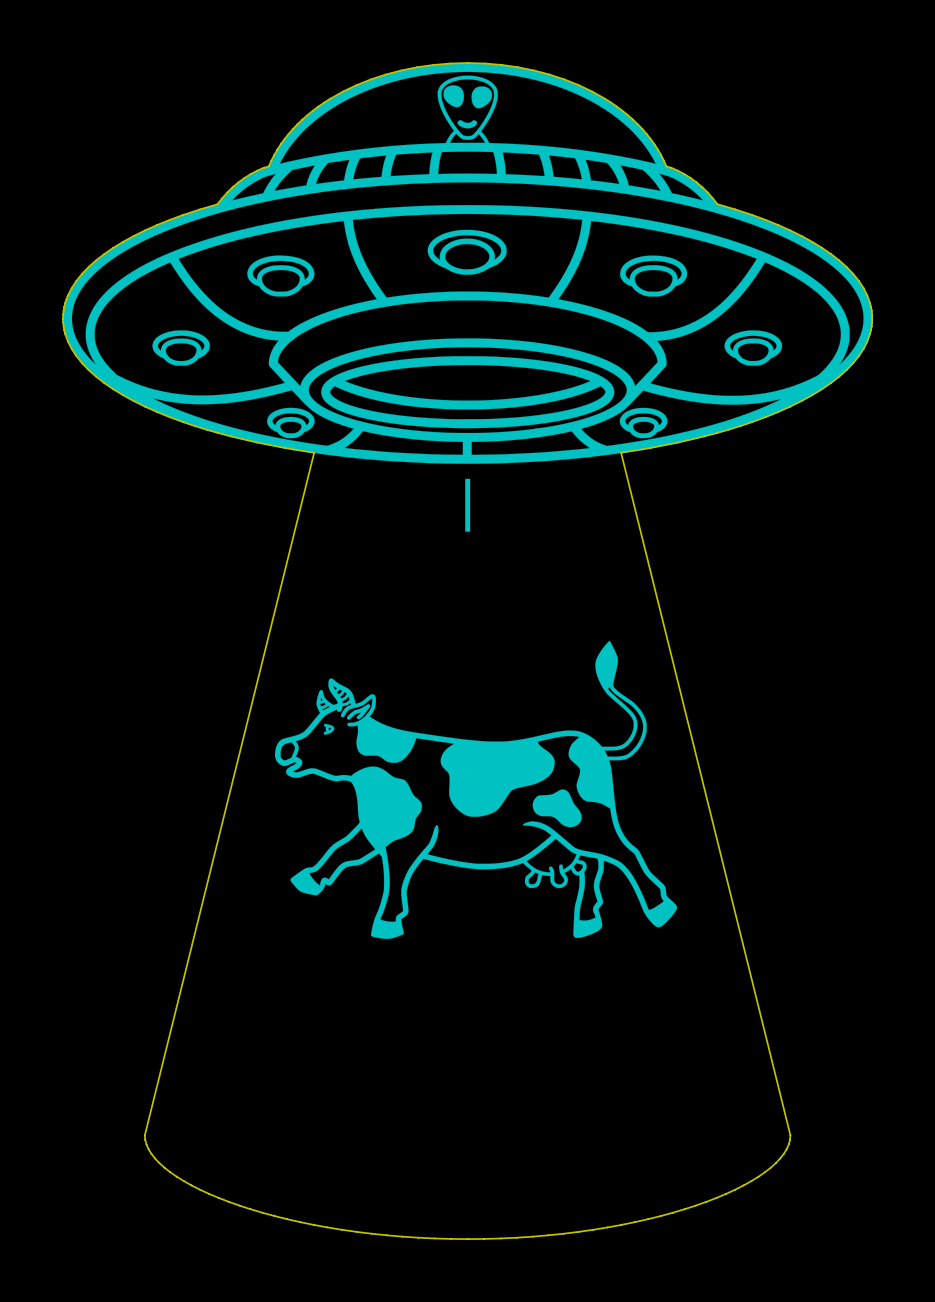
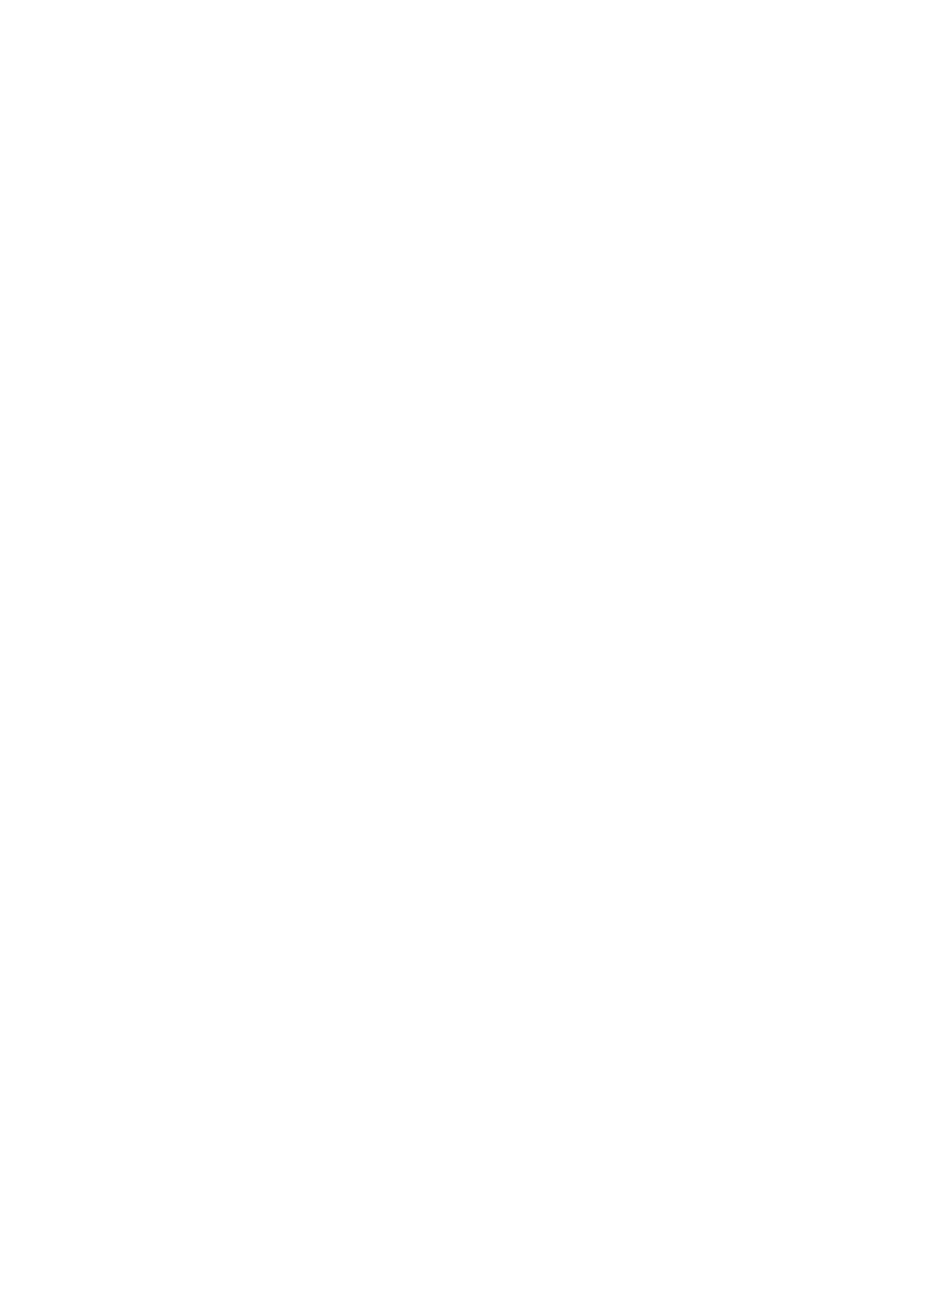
drawing: [62, 62, 874, 1240] -> none

